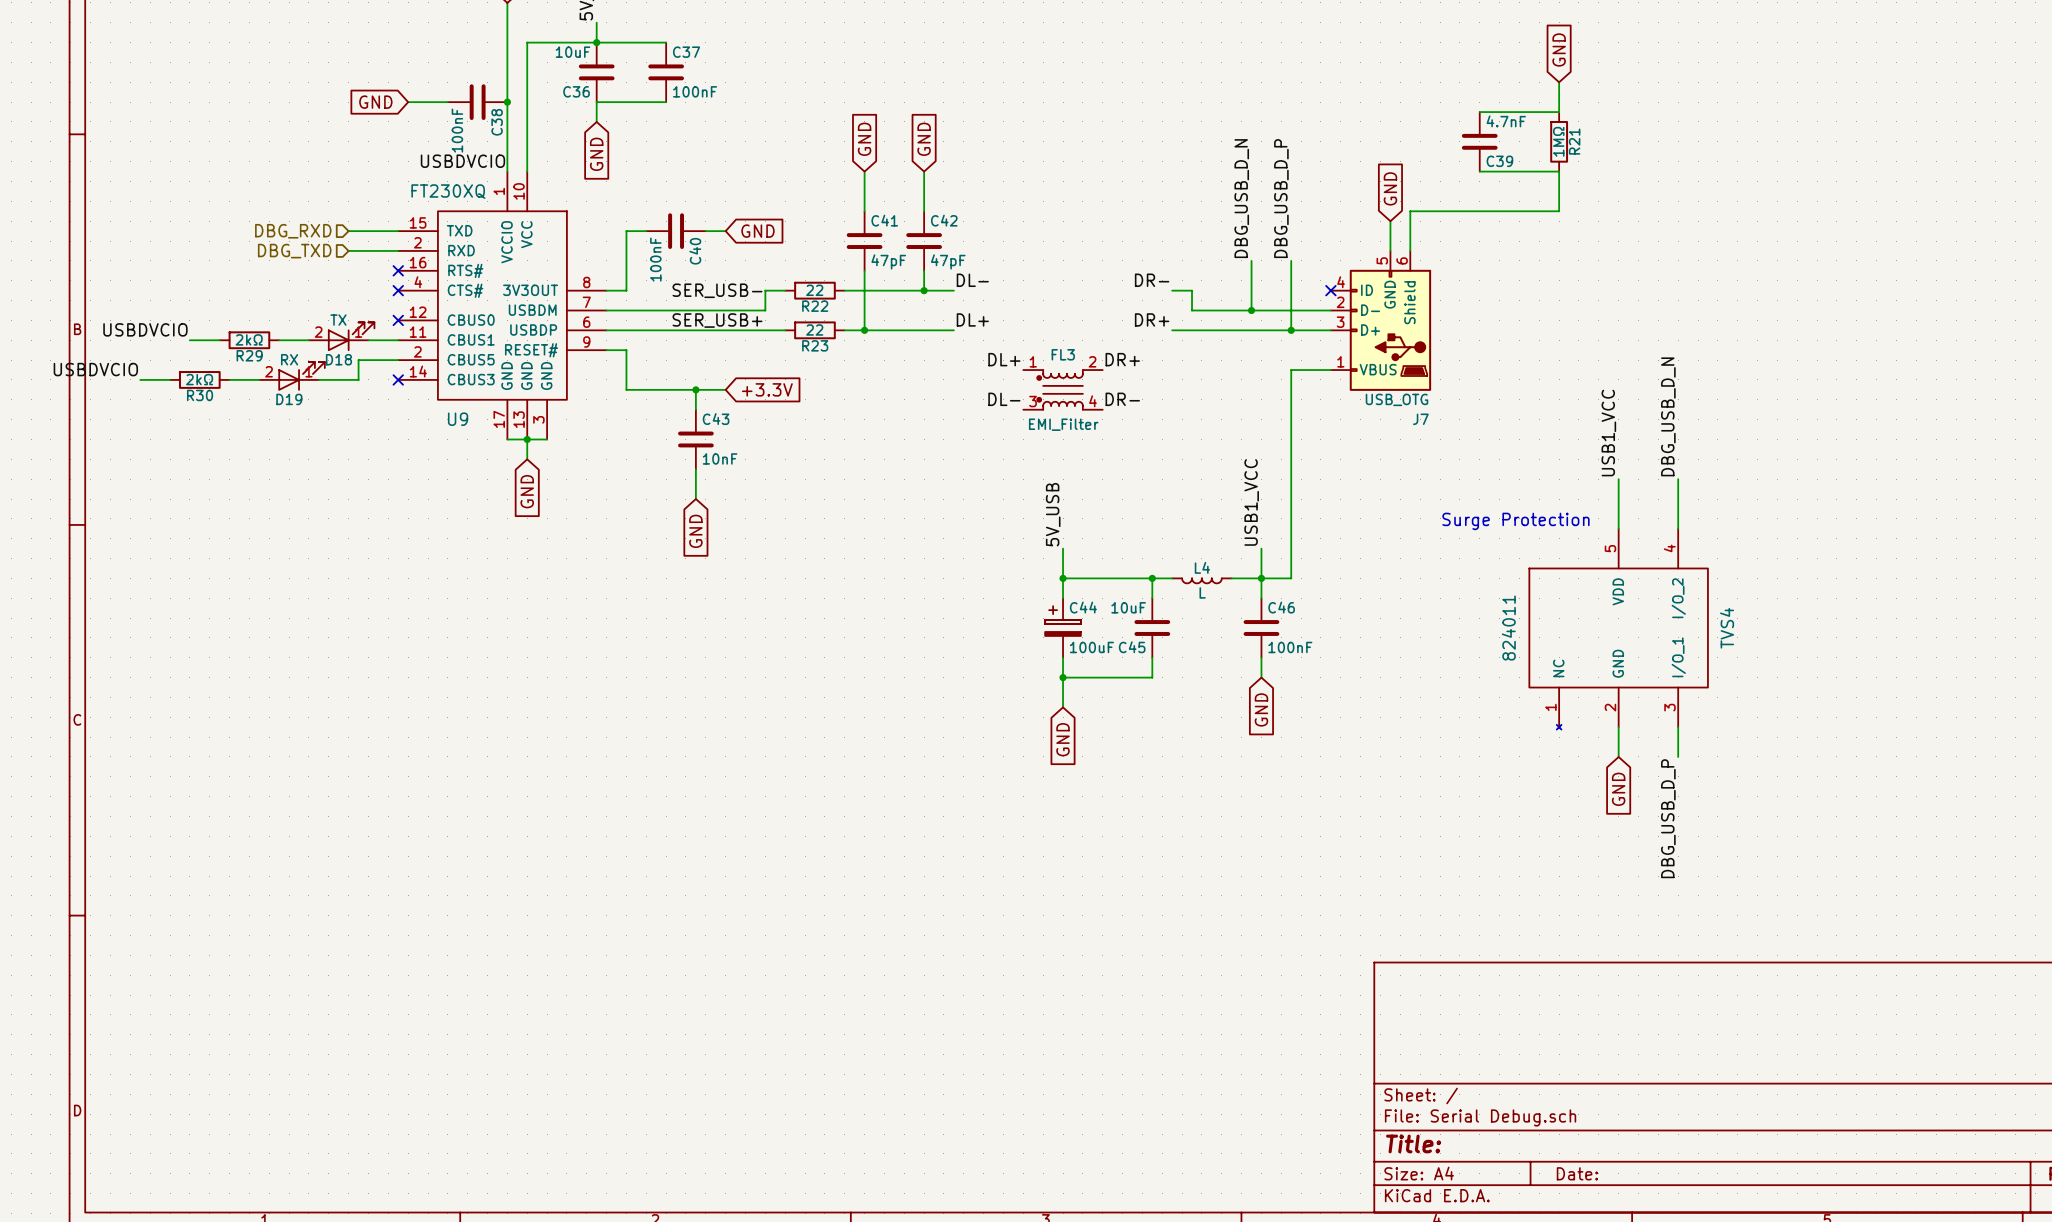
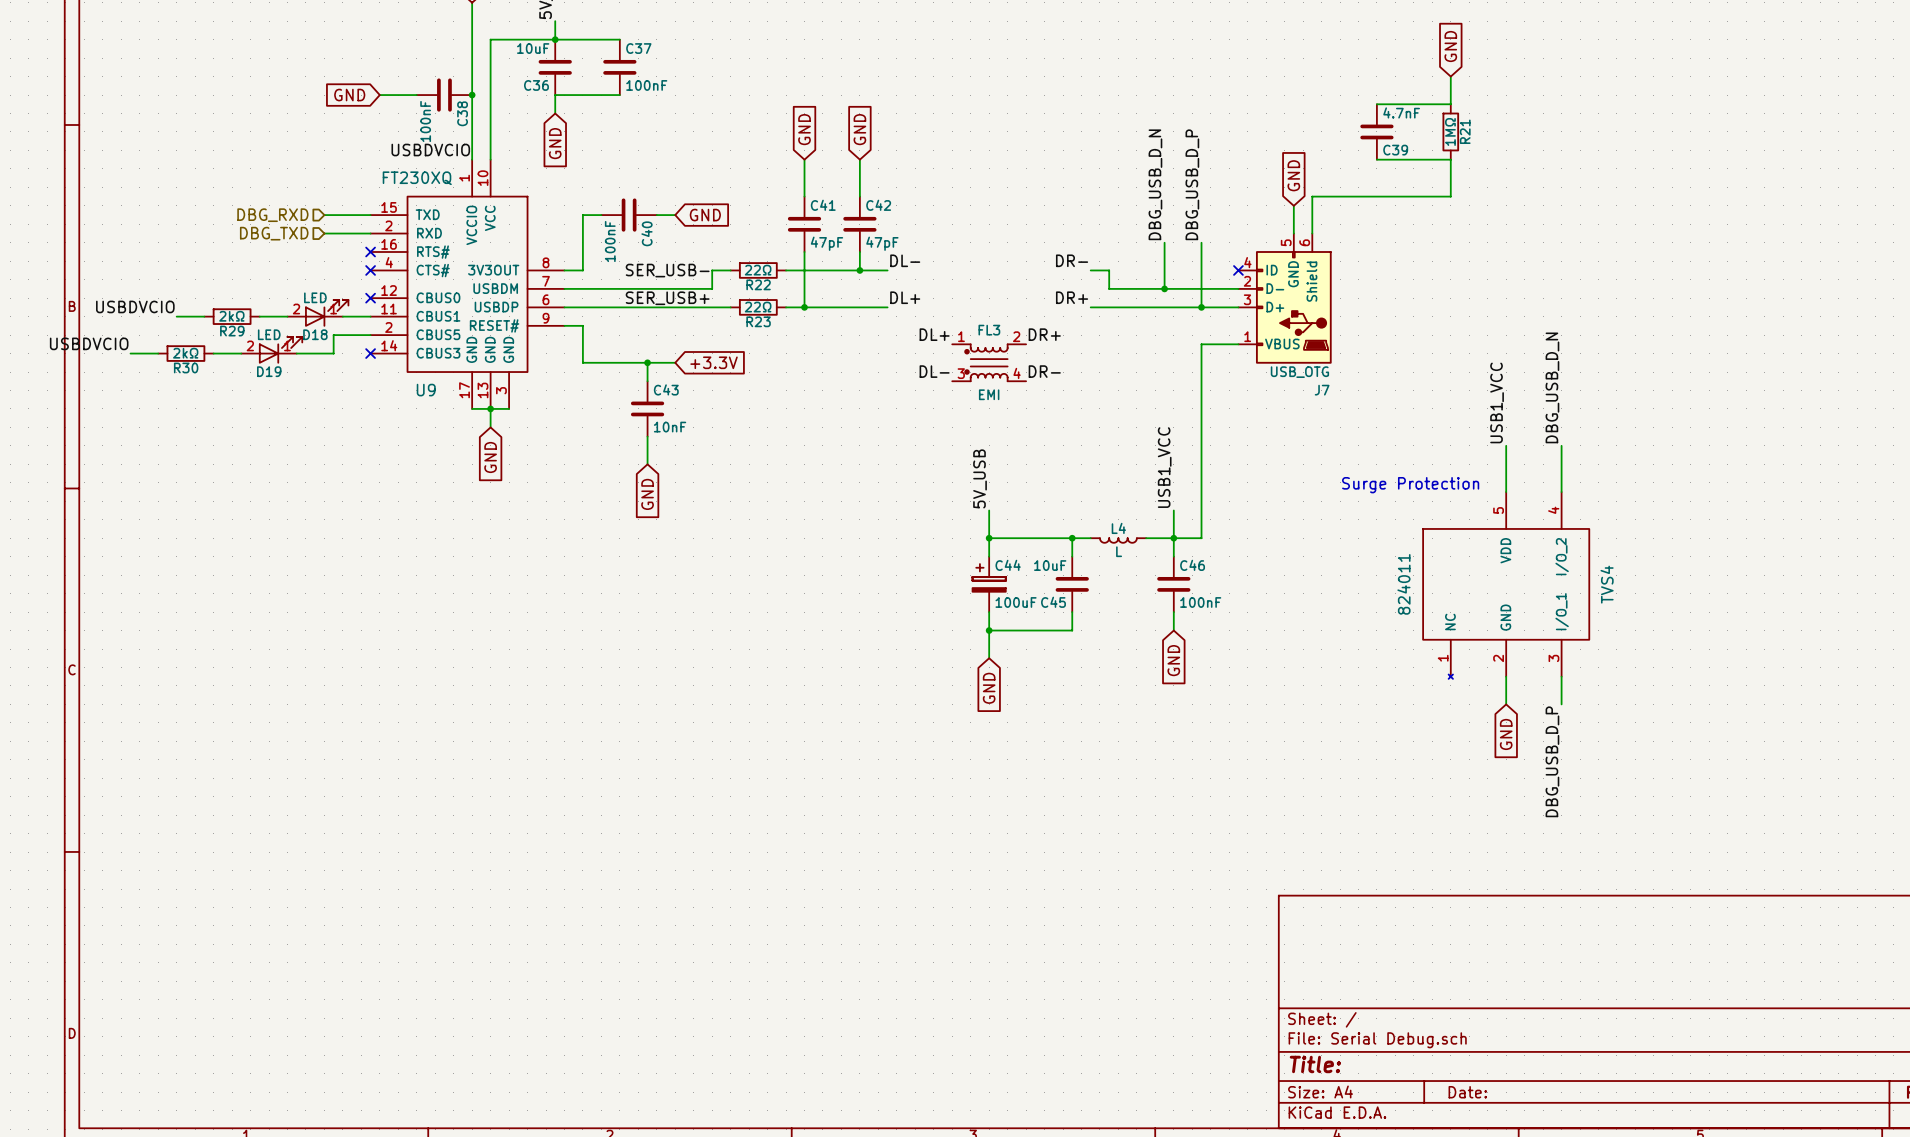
R22 value: 22 (814, 290) -> 22Ω (758, 270)
D18 value: TX (338, 320) -> LED (315, 297)
R23 value: 22 (814, 329) -> 22Ω (758, 307)
D19 value: RX (289, 359) -> LED (269, 334)
FL3 value: EMI_Filter (1063, 424) -> EMI (989, 394)

